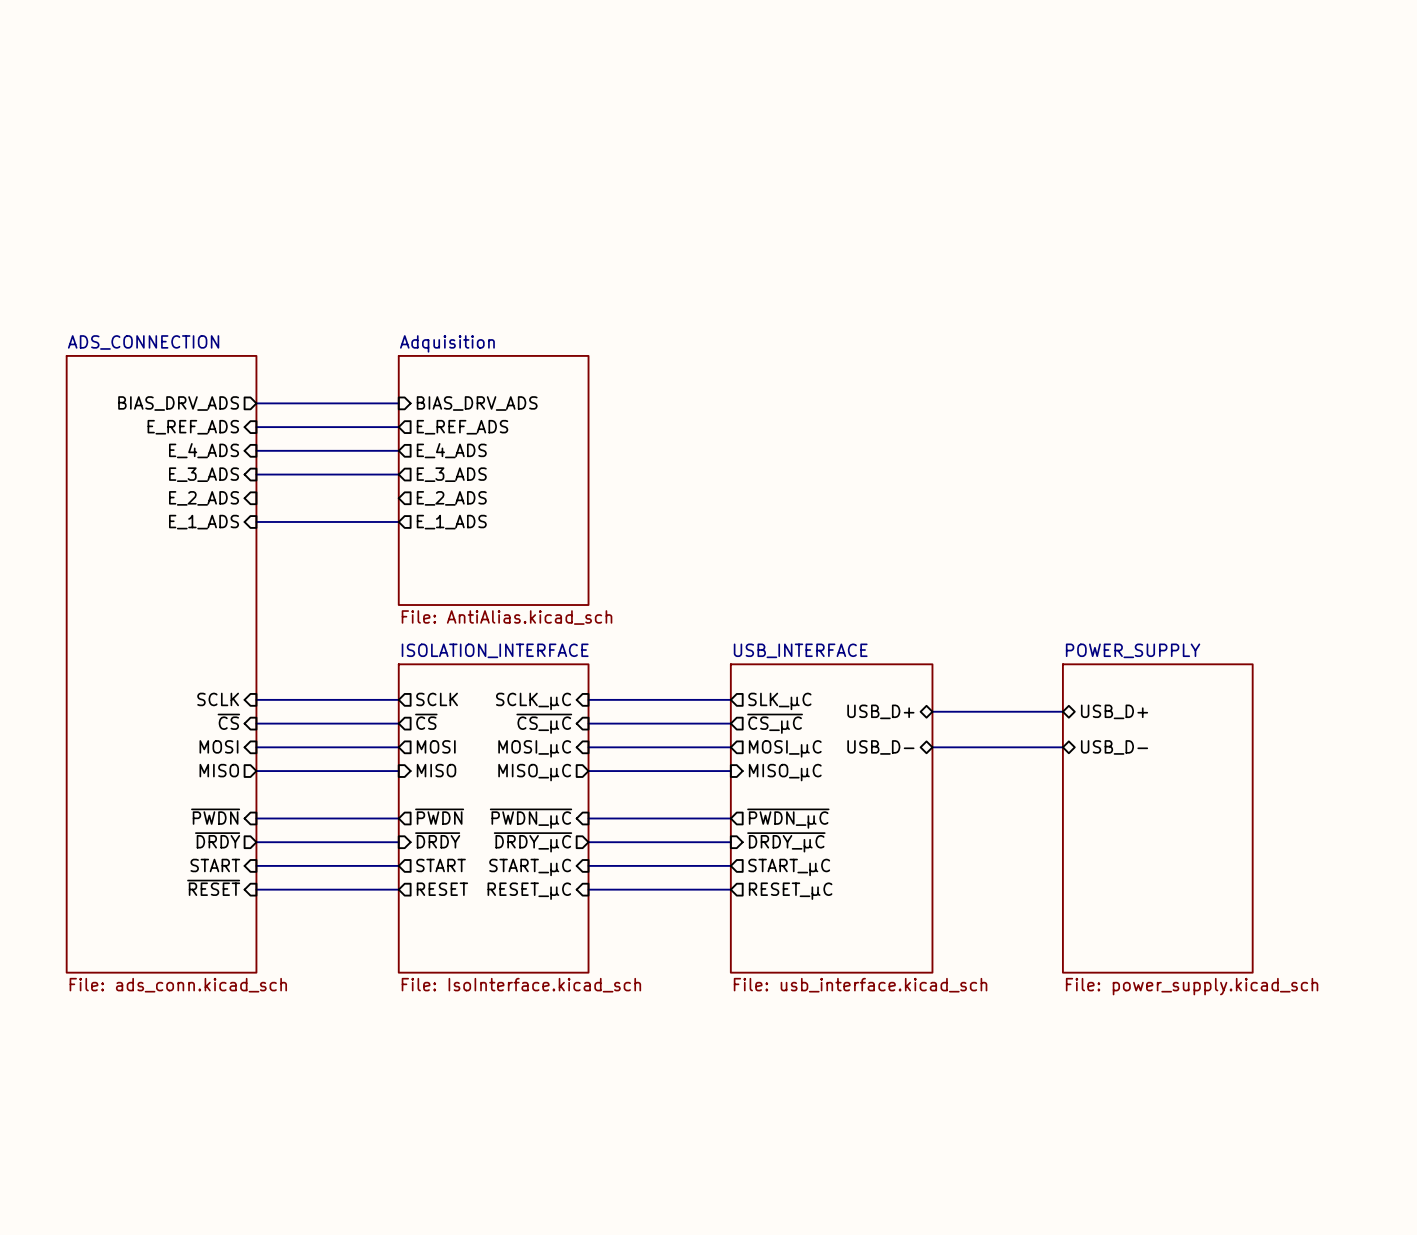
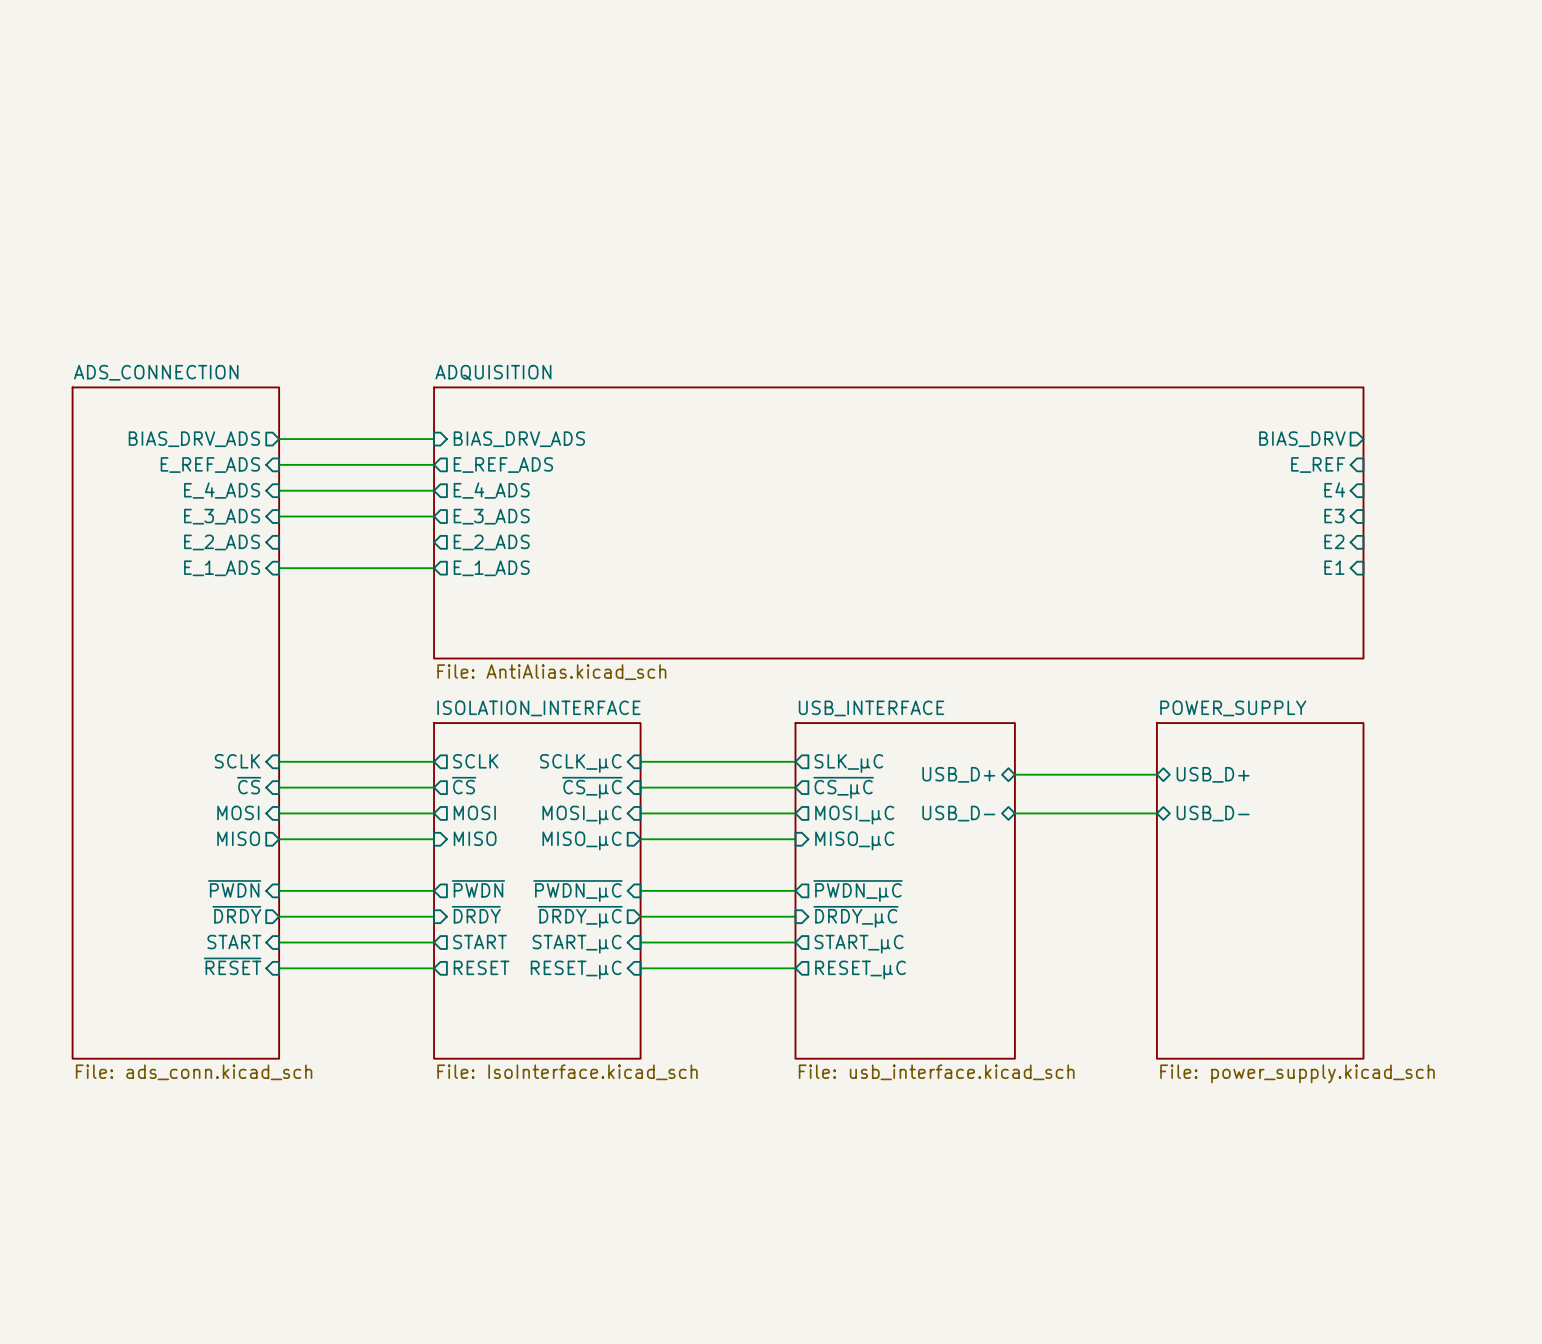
sheet pin: none -> BIAS_DRV (1302, 439)
sheet pin: none -> E_REF (1318, 465)
sheet pin: none -> E4 (1334, 489)
sheet pin: none -> E3 (1334, 516)
sheet Adquisition: File: AntiAlias.kicad_sch (493, 480) -> none
sheet ADQUISITION: none -> File: AntiAlias.kicad_sch (898, 522)
sheet pin: none -> E2 (1334, 541)
sheet pin: none -> E1 (1334, 567)

